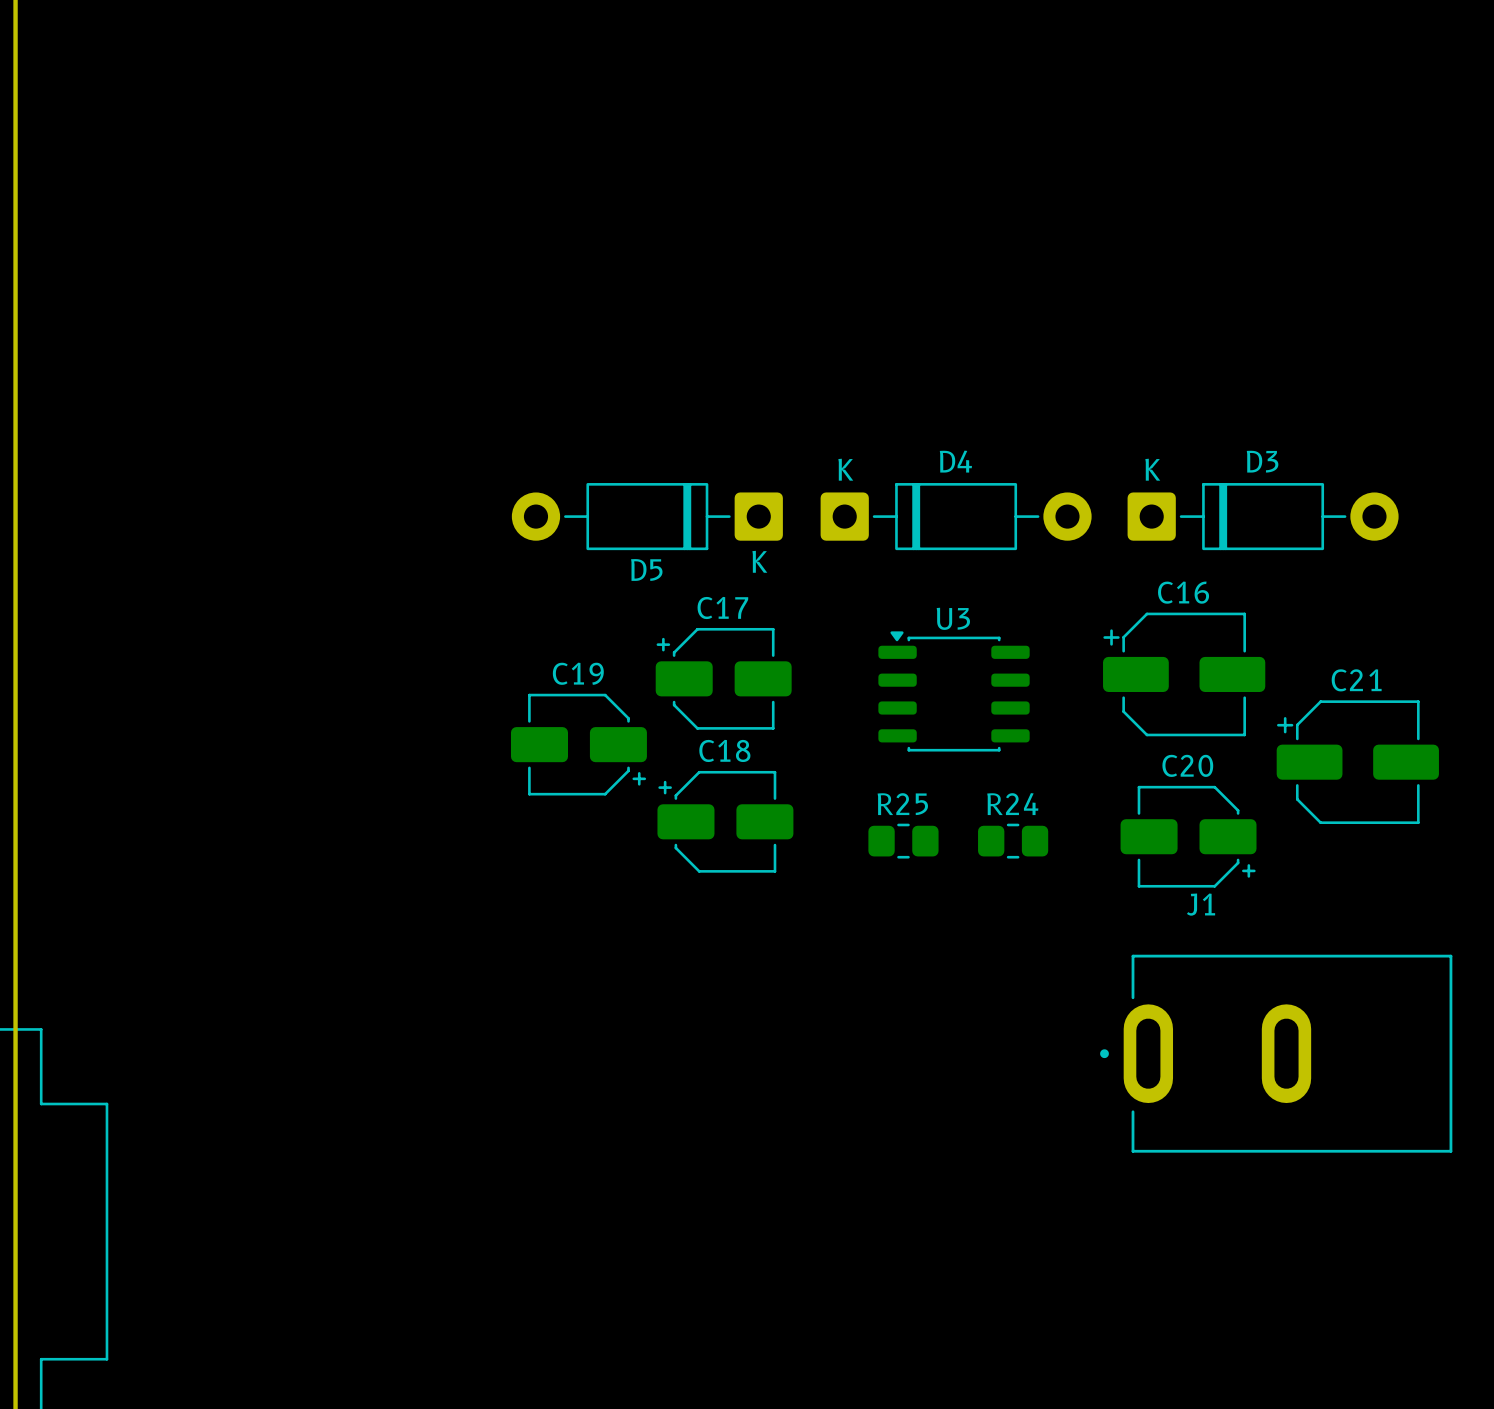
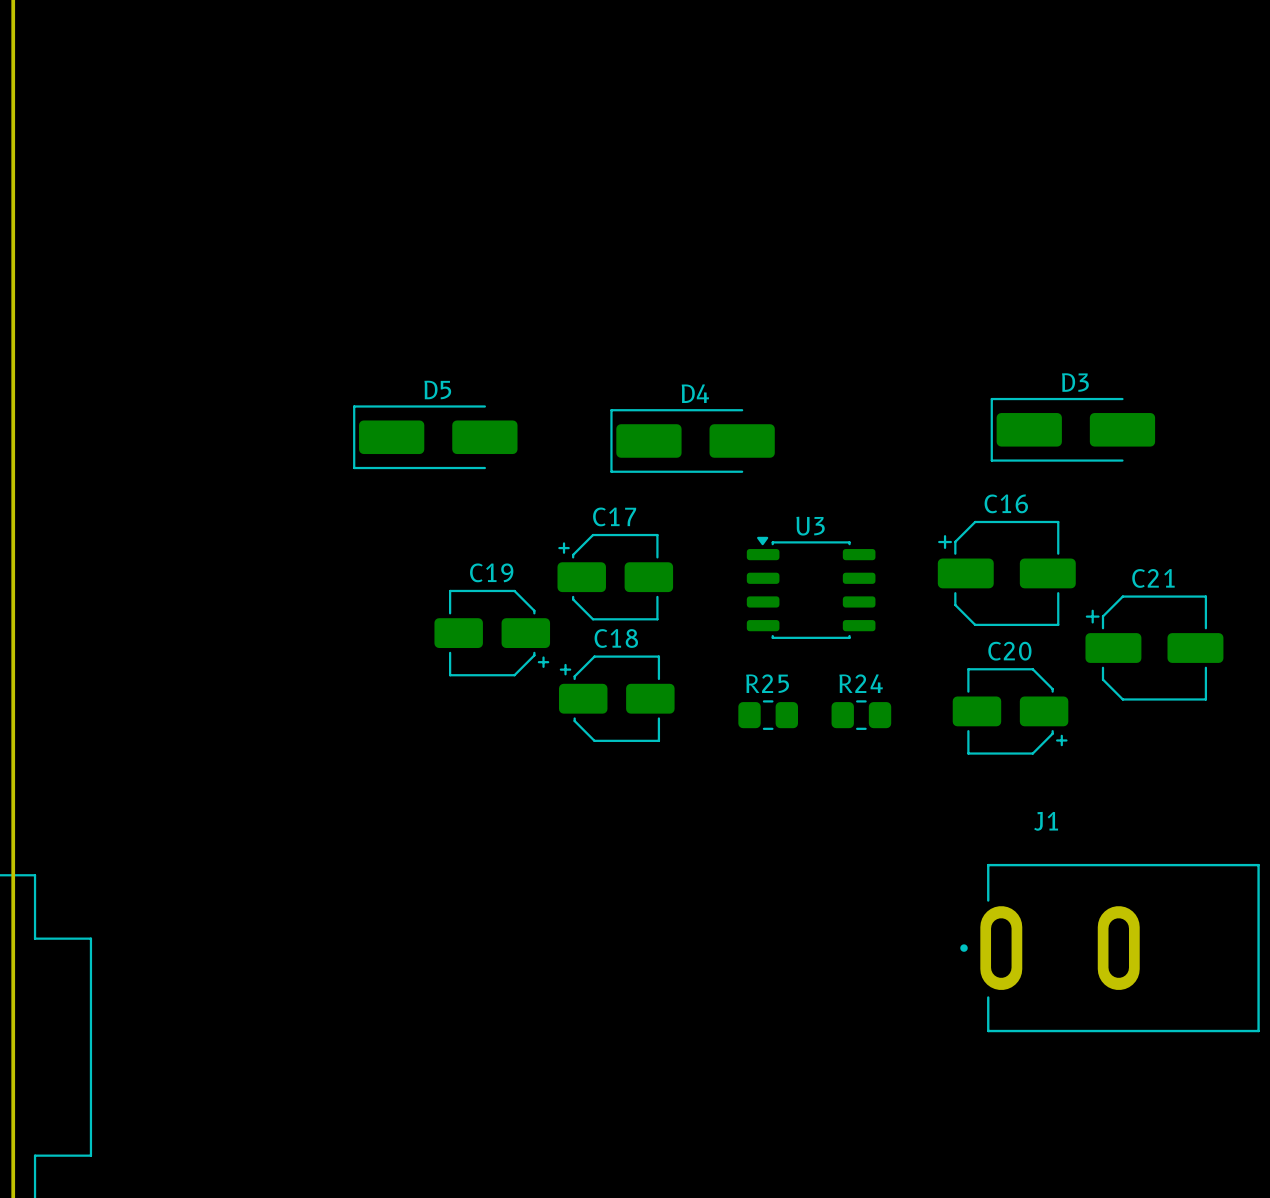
D5 footprint: [511, 483, 783, 551] -> [353, 405, 518, 470]
D4 footprint: [820, 483, 1092, 551] -> [610, 409, 775, 473]
D3 footprint: [1127, 483, 1399, 551] -> [990, 397, 1156, 462]
D5 name position: D5 (646, 569) -> D5 (437, 390)
J1 position: (1276, 1053) -> (1110, 948)

